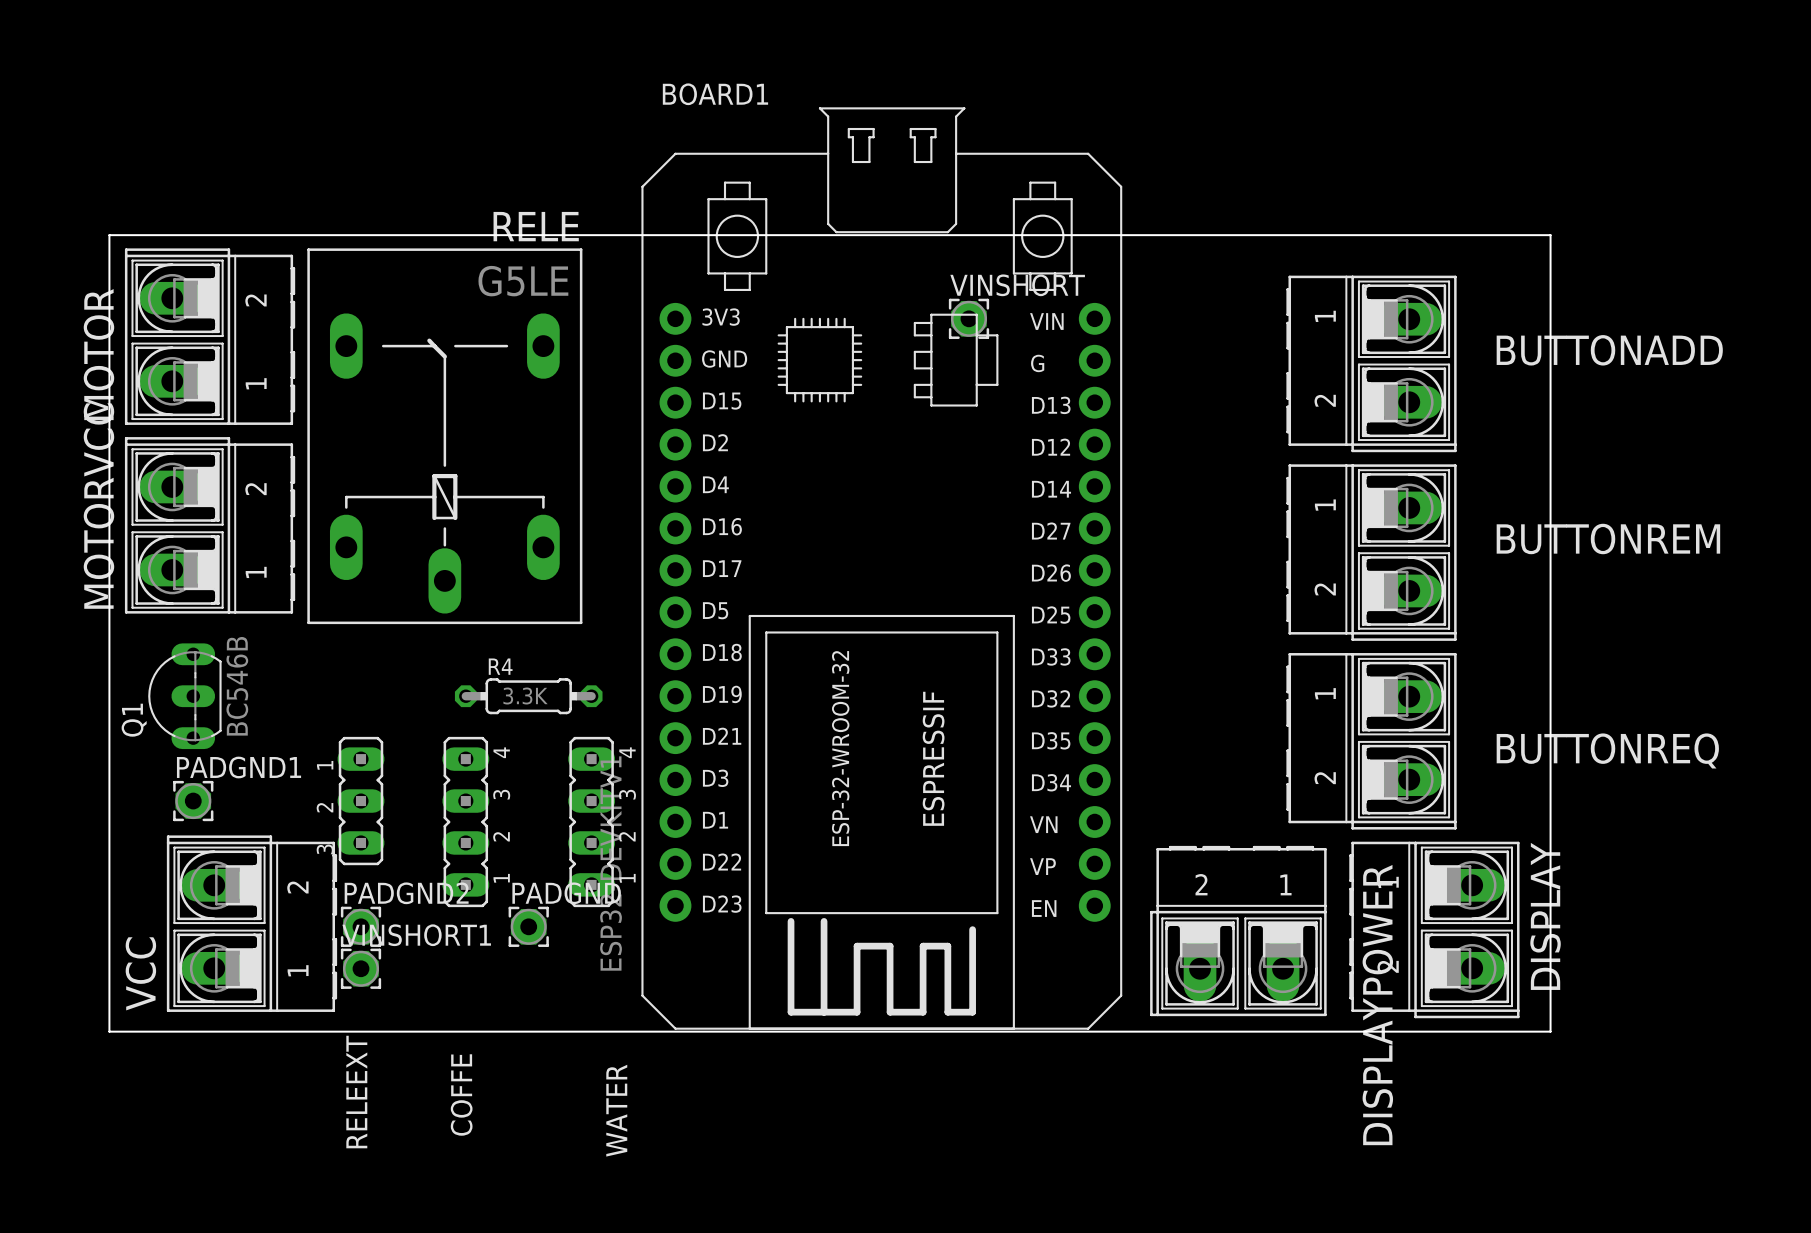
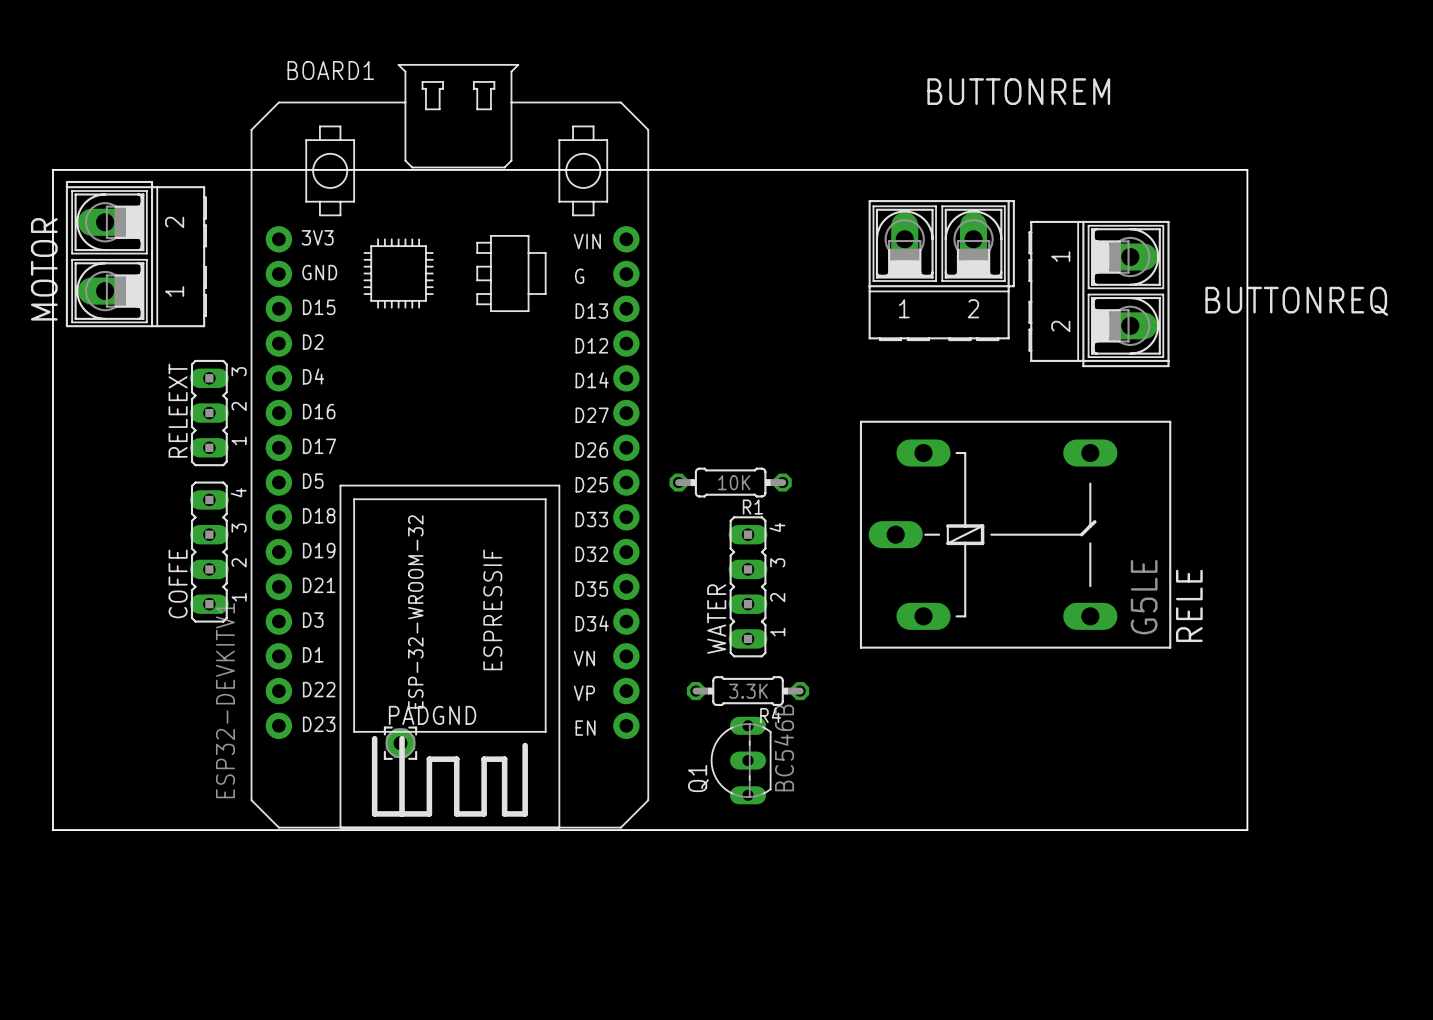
BOARD1 name position: BOARD1 (715, 94) -> BOARD1 (330, 70)
VINSHORT: (968, 318) -> none
BUTTONREM: none -> (941, 270)
BUTTONADD: (1371, 363) -> none
RELE: G5LE (444, 436) -> none
MOTORVCC: (210, 525) -> none
RELEEXT: none -> (209, 413)
BUTTONREM: (1371, 552) -> none
BOARD1 position: (881, 568) -> (449, 446)
R1: none -> 10K (730, 482)
R4 name position: R4 (500, 666) -> R4 (770, 715)
RELE: none -> G5LE (1015, 534)
Q1 position: (184, 696) -> (741, 760)
R4 value position: 3.3K (525, 696) -> 3.3K (748, 691)
R4 position: (528, 696) -> (748, 691)
BUTTONREQ position: (1371, 741) -> (1099, 294)
PADGND1: (193, 801) -> none
RELEEXT: (361, 801) -> none
COFFE position: (465, 822) -> (209, 552)
WATER position: (591, 822) -> (748, 586)
VCC: (251, 923) -> none
PADGND2: (361, 926) -> none
DISPLAY: (1434, 929) -> none
DISPLAYPOWER: (1238, 931) -> none
VINSHORT1: (361, 968) -> none
COFFE name position: COFFE (461, 1095) -> COFFE (178, 583)
WATER name position: WATER (616, 1110) -> WATER (716, 619)

